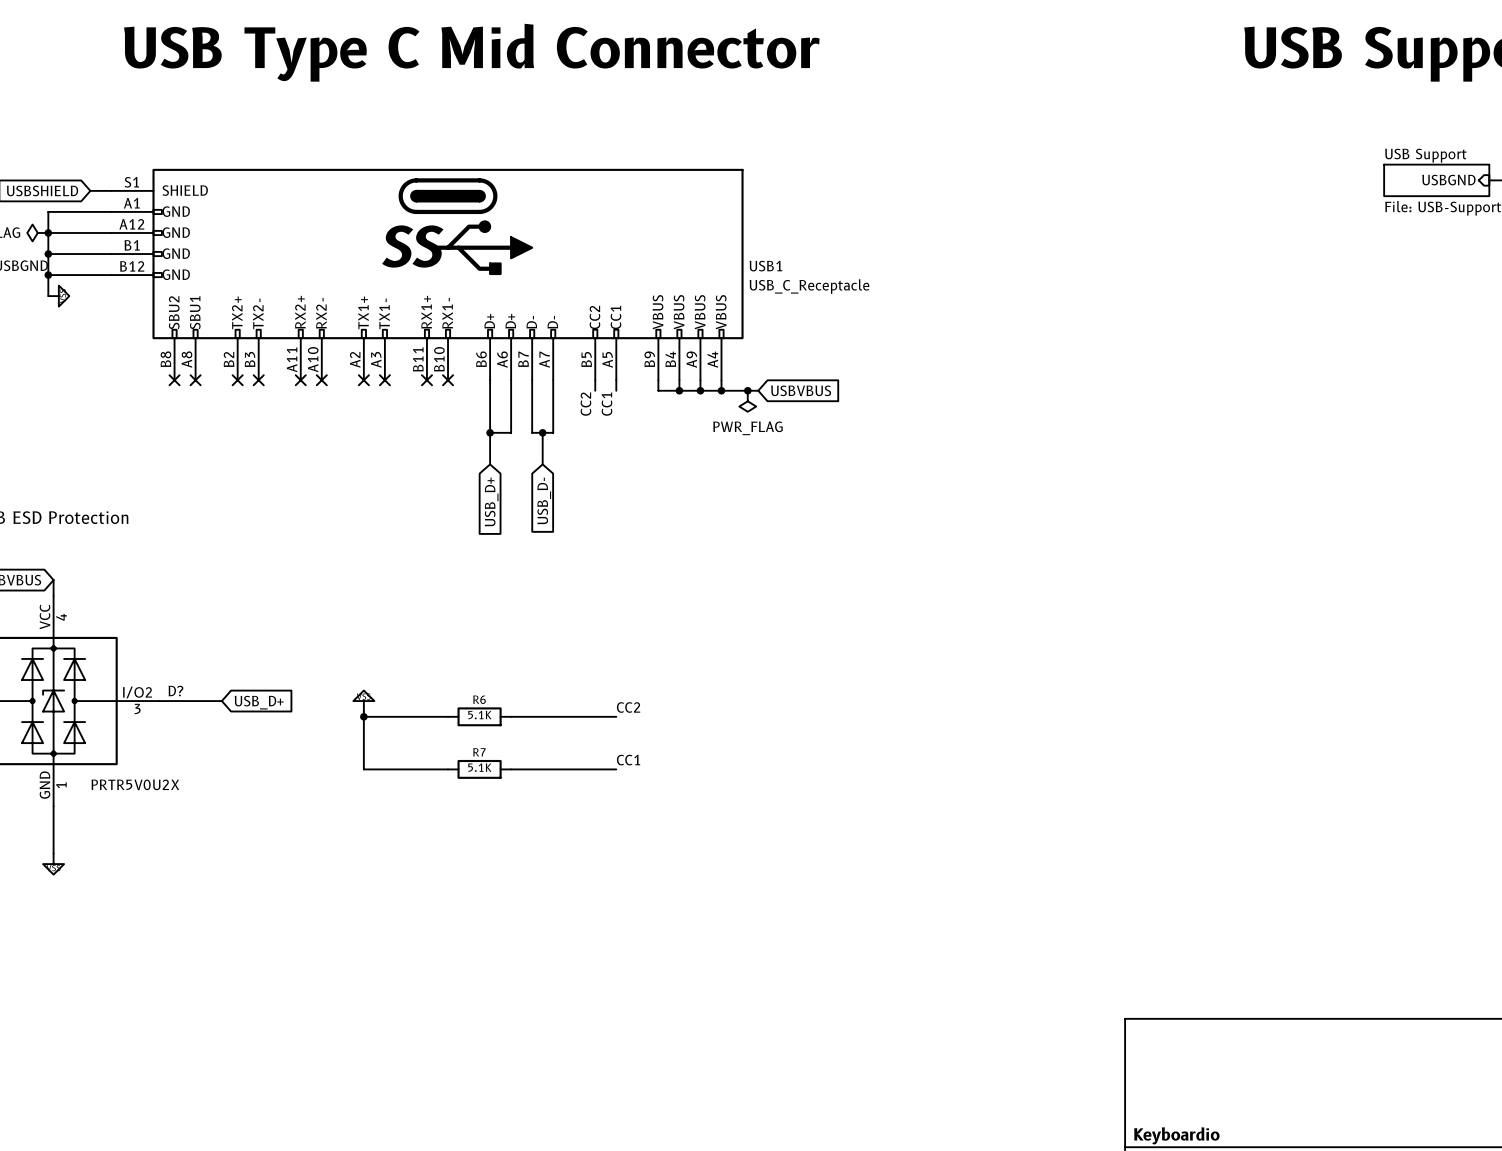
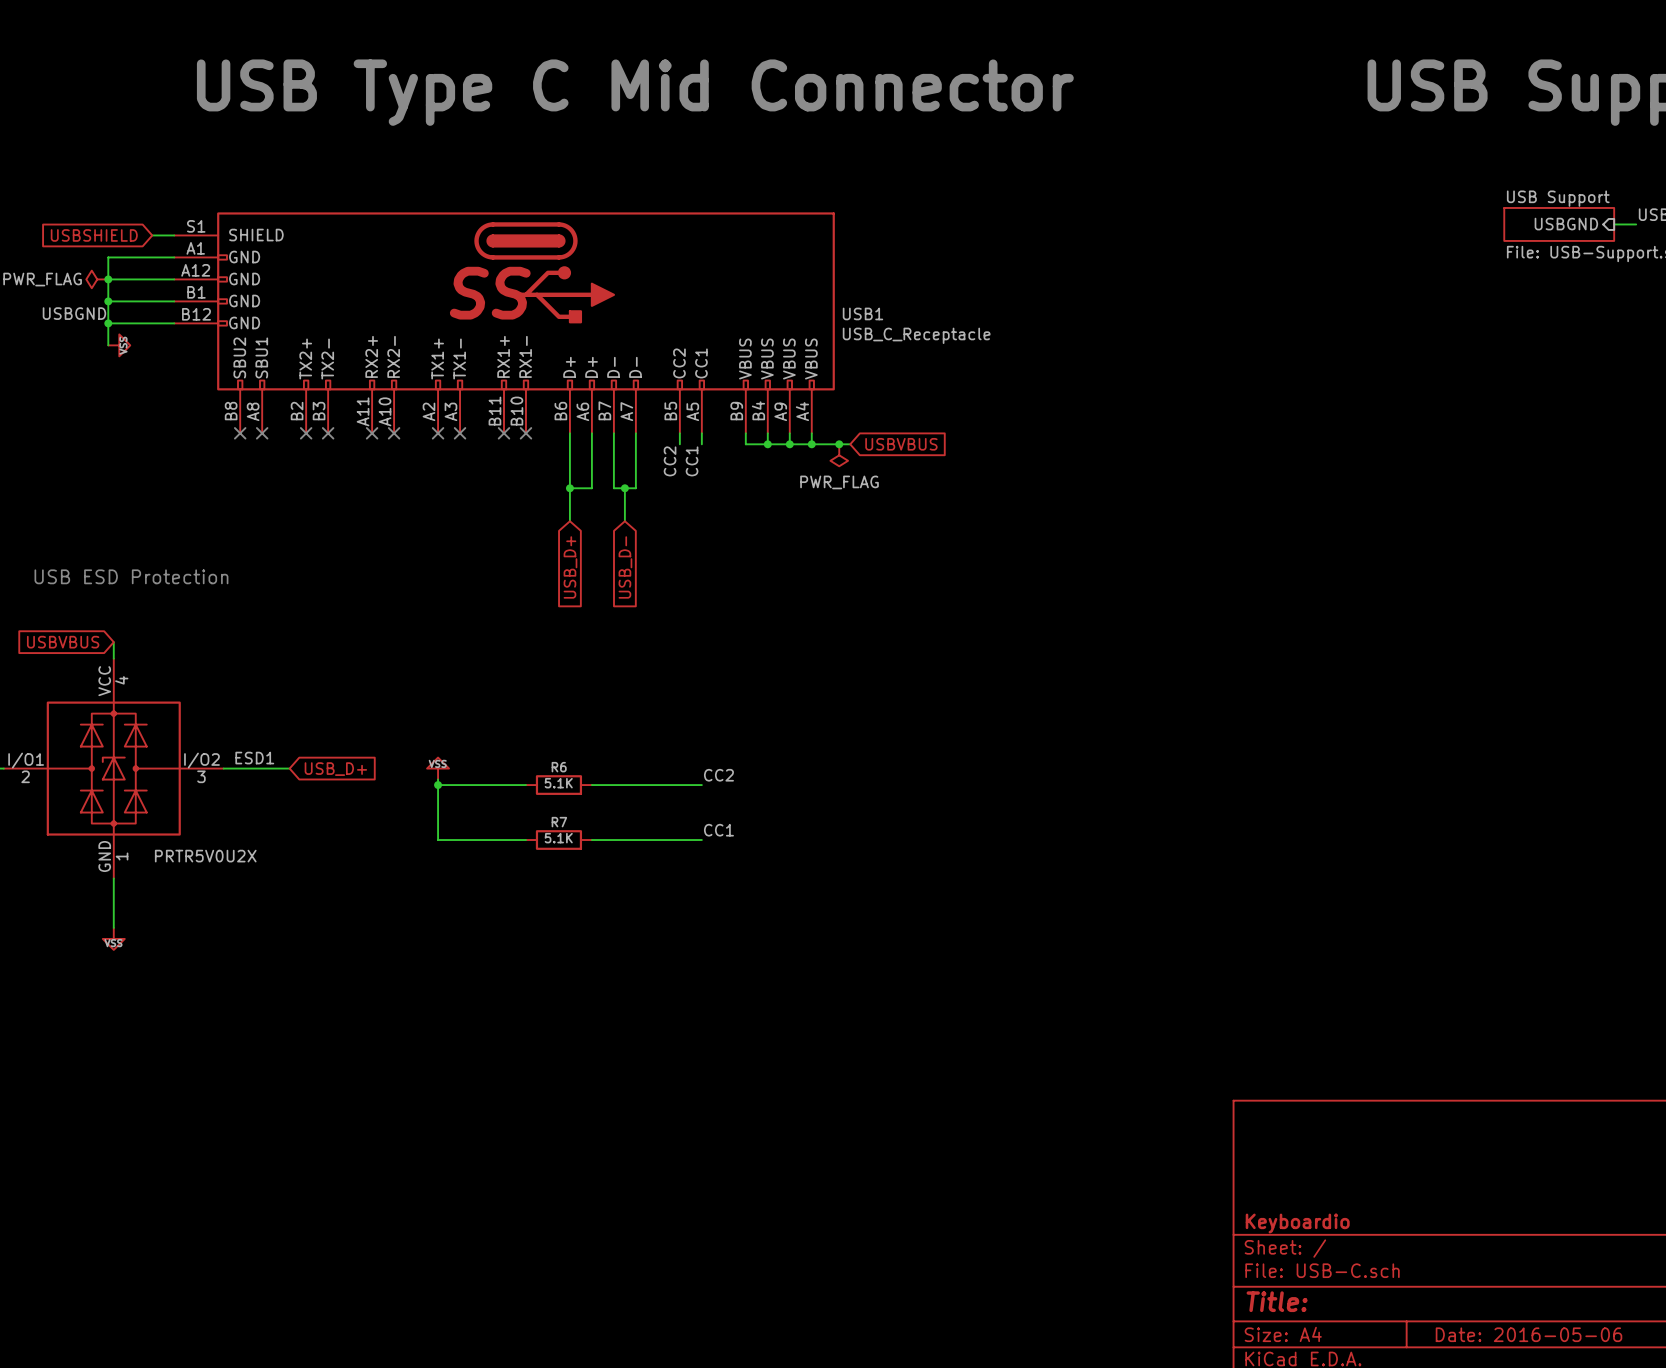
D? name: D? (175, 691) -> ESD1 (254, 758)

